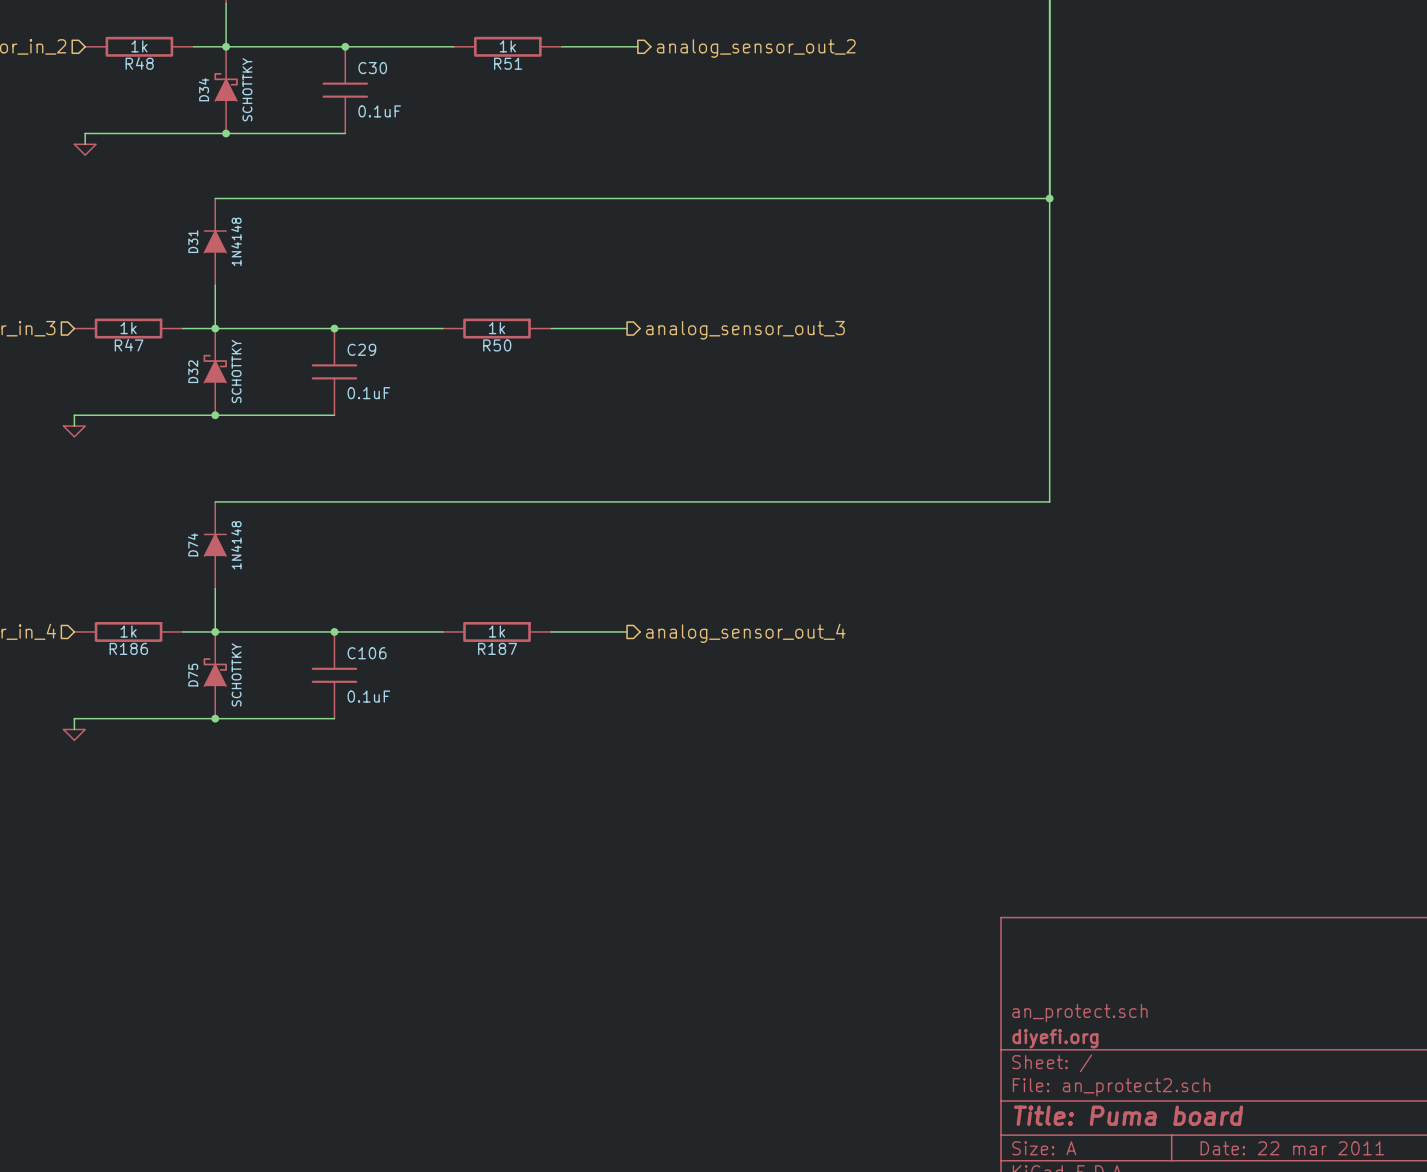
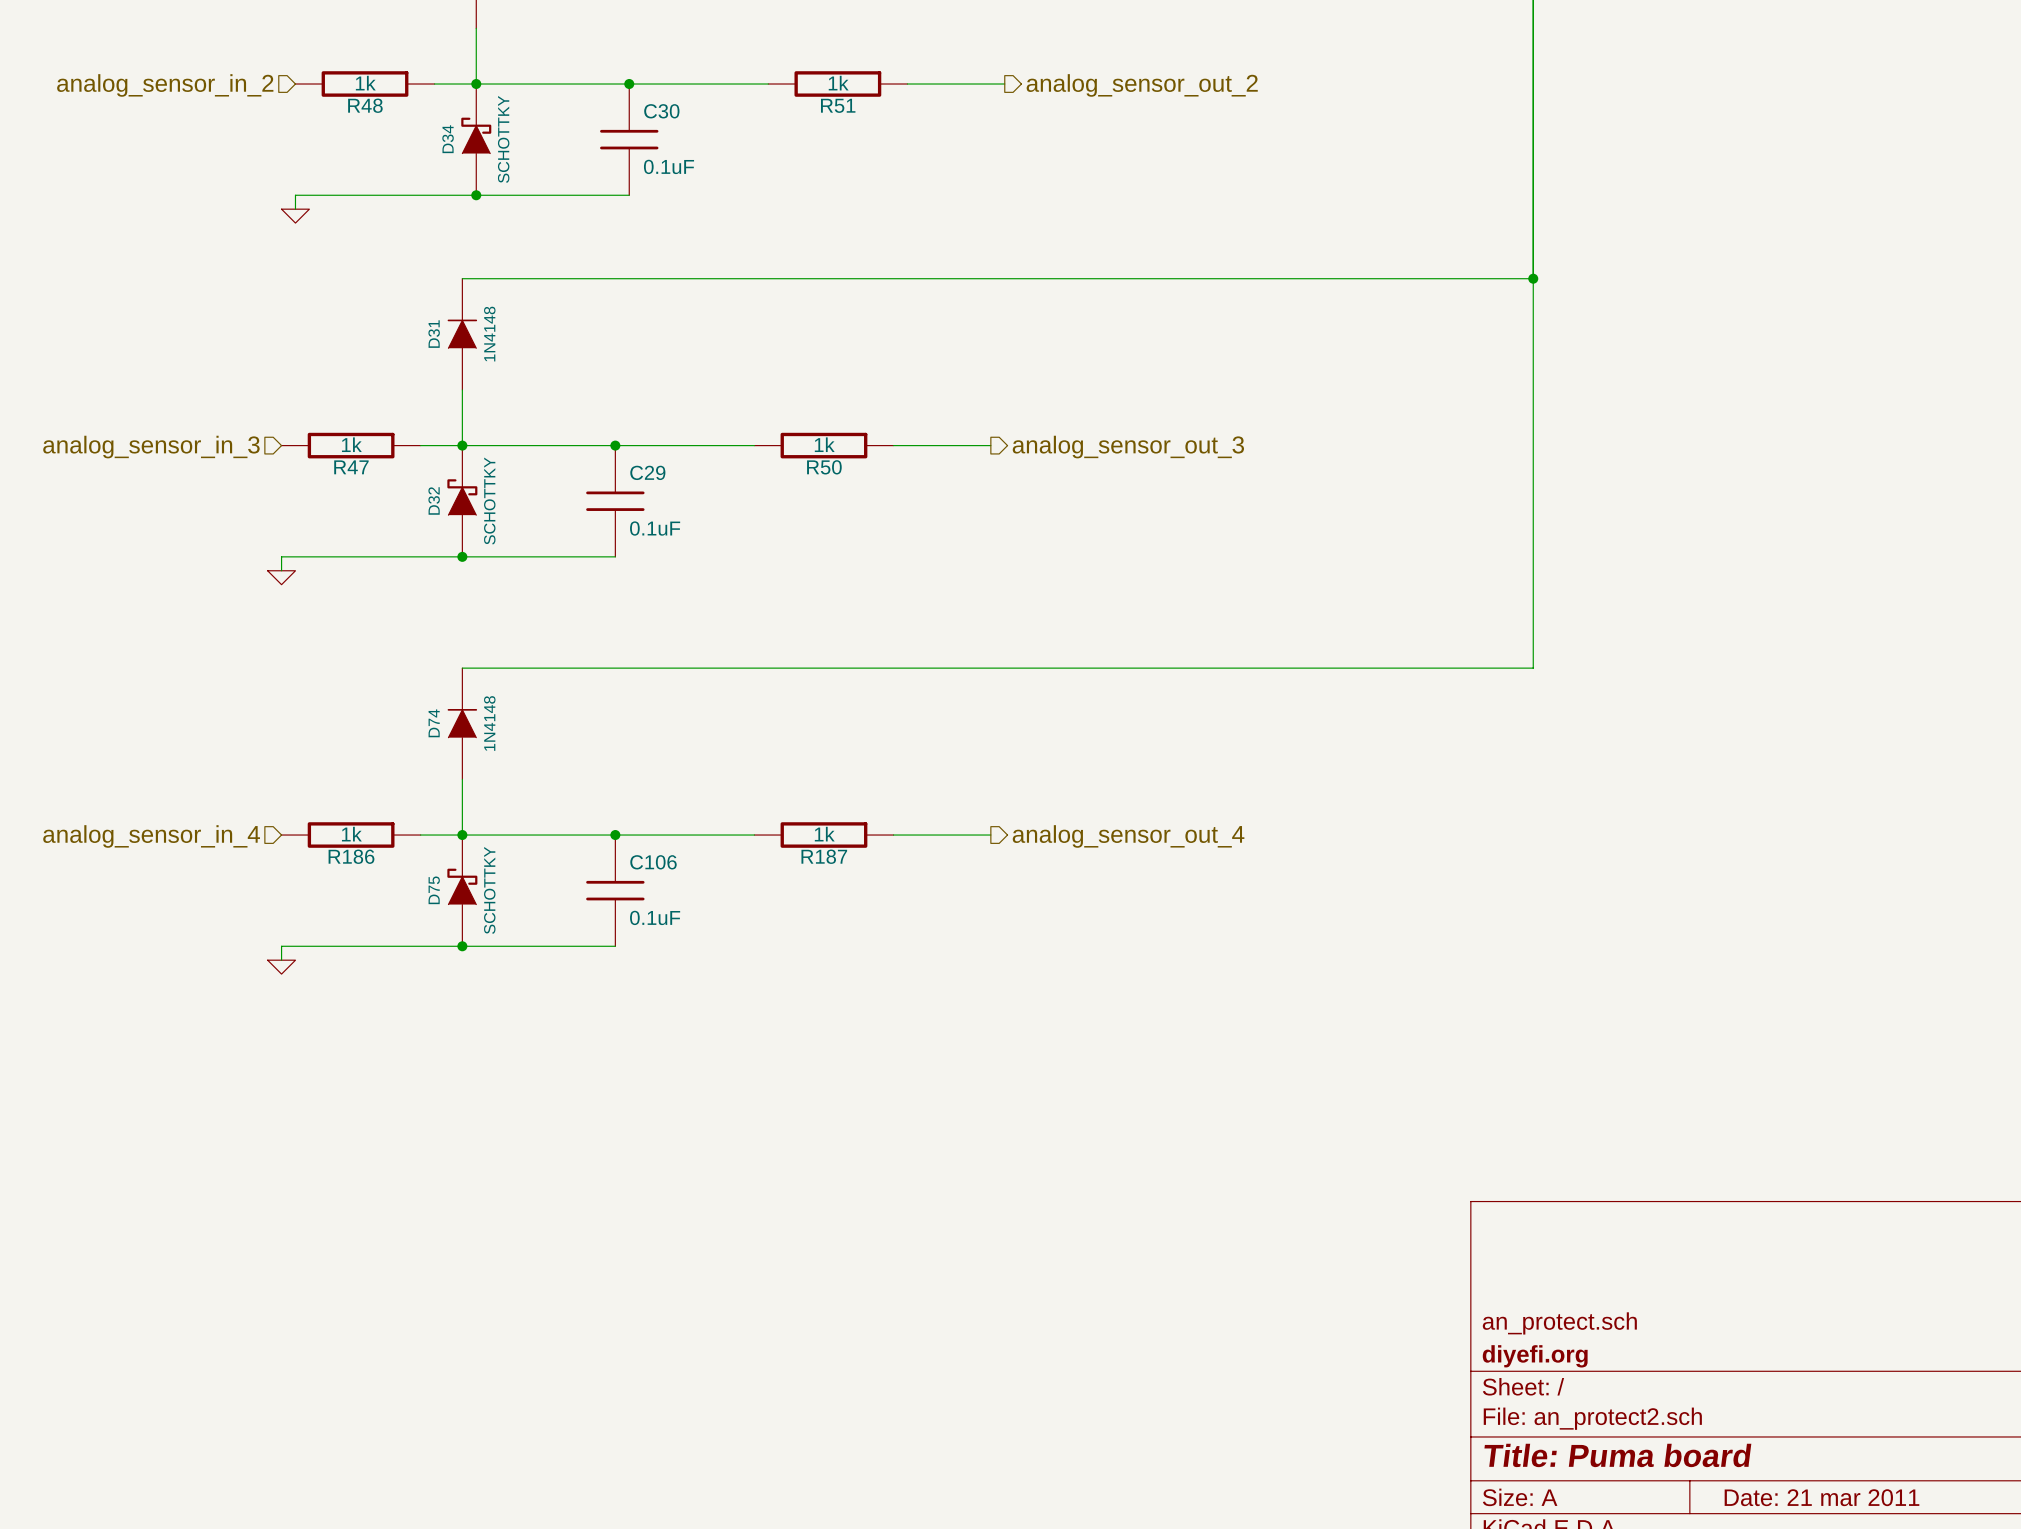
title block: Date: 22 mar 2011 (1292, 1148) -> Date: 21 mar 2011 (1821, 1497)

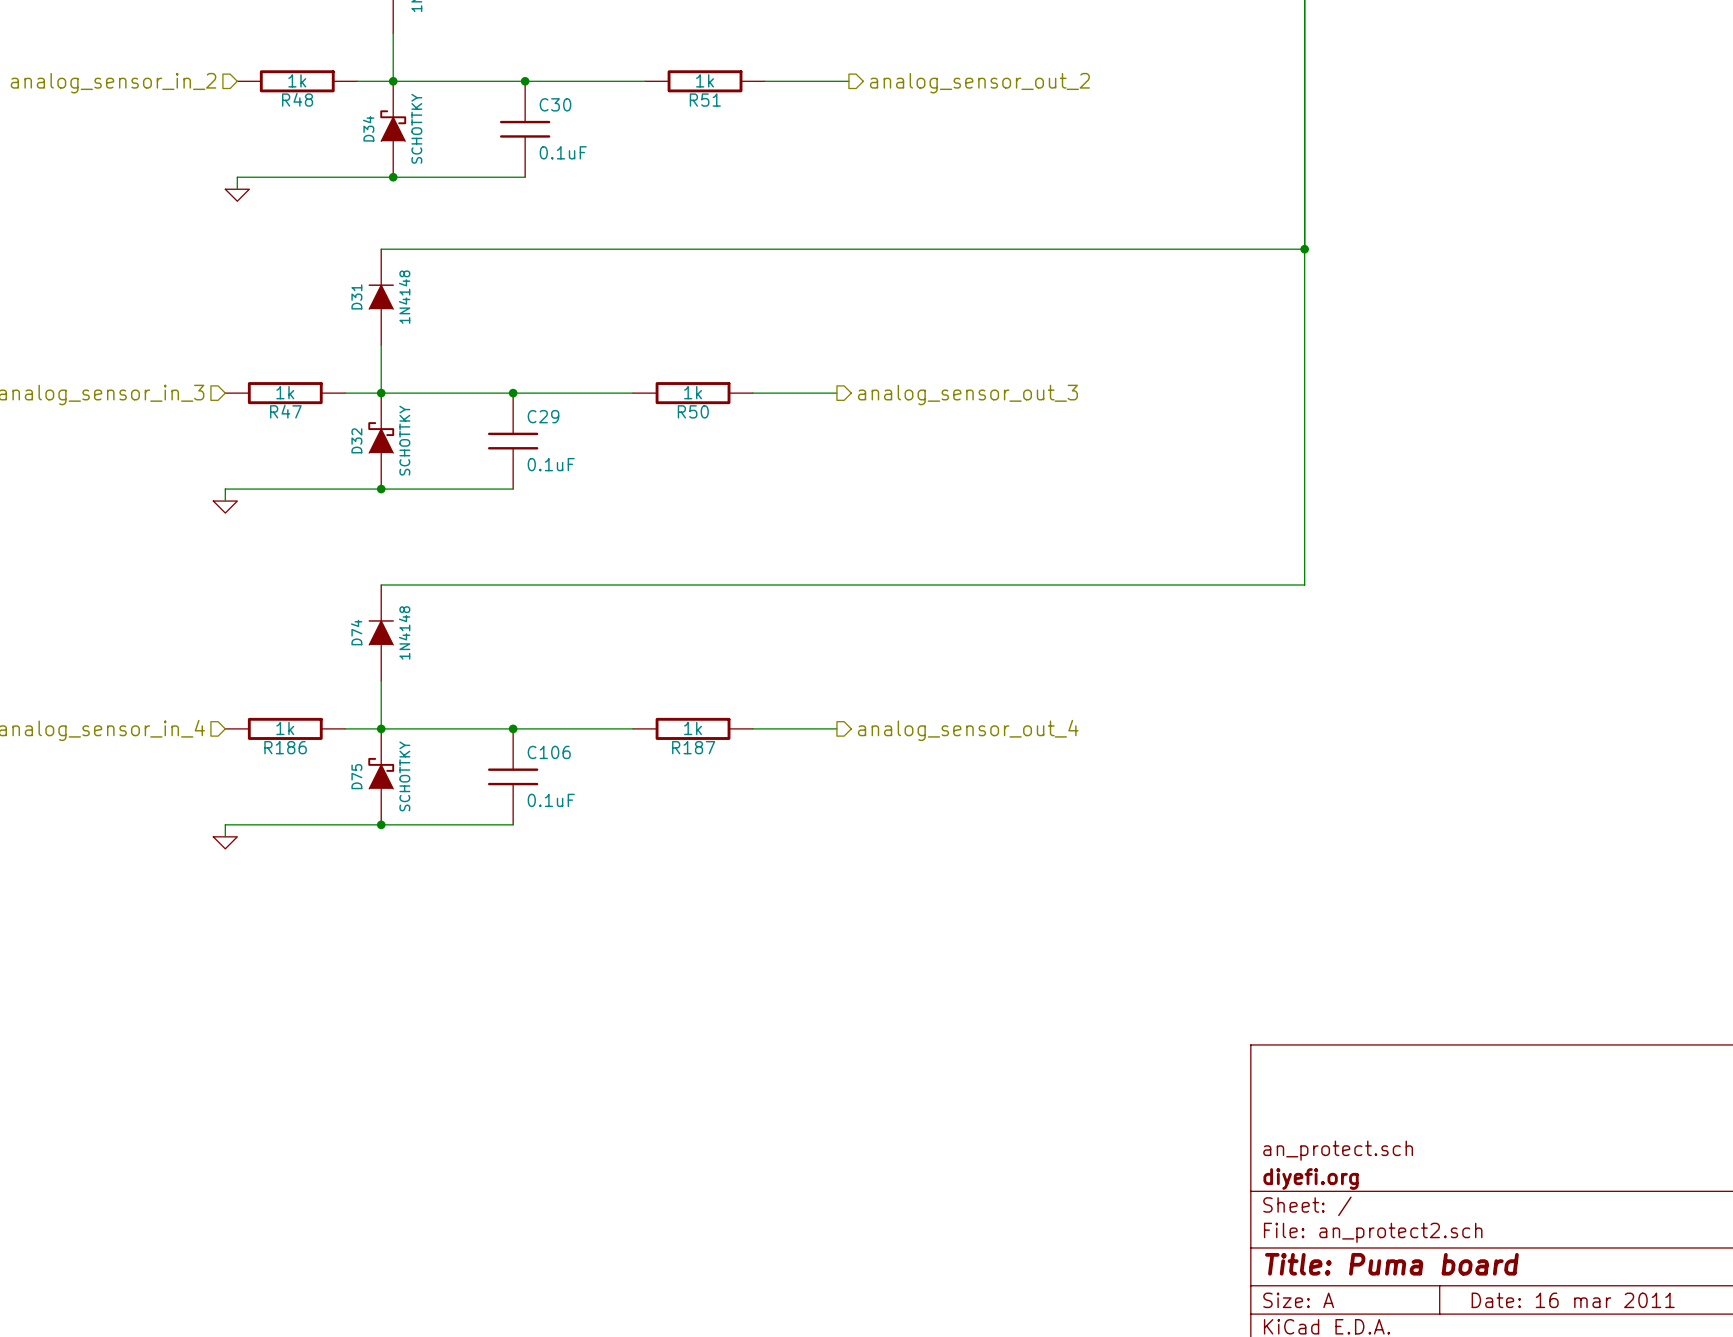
title block: Date: 21 mar 2011 (1821, 1497) -> Date: 16 mar 2011 (1573, 1300)

